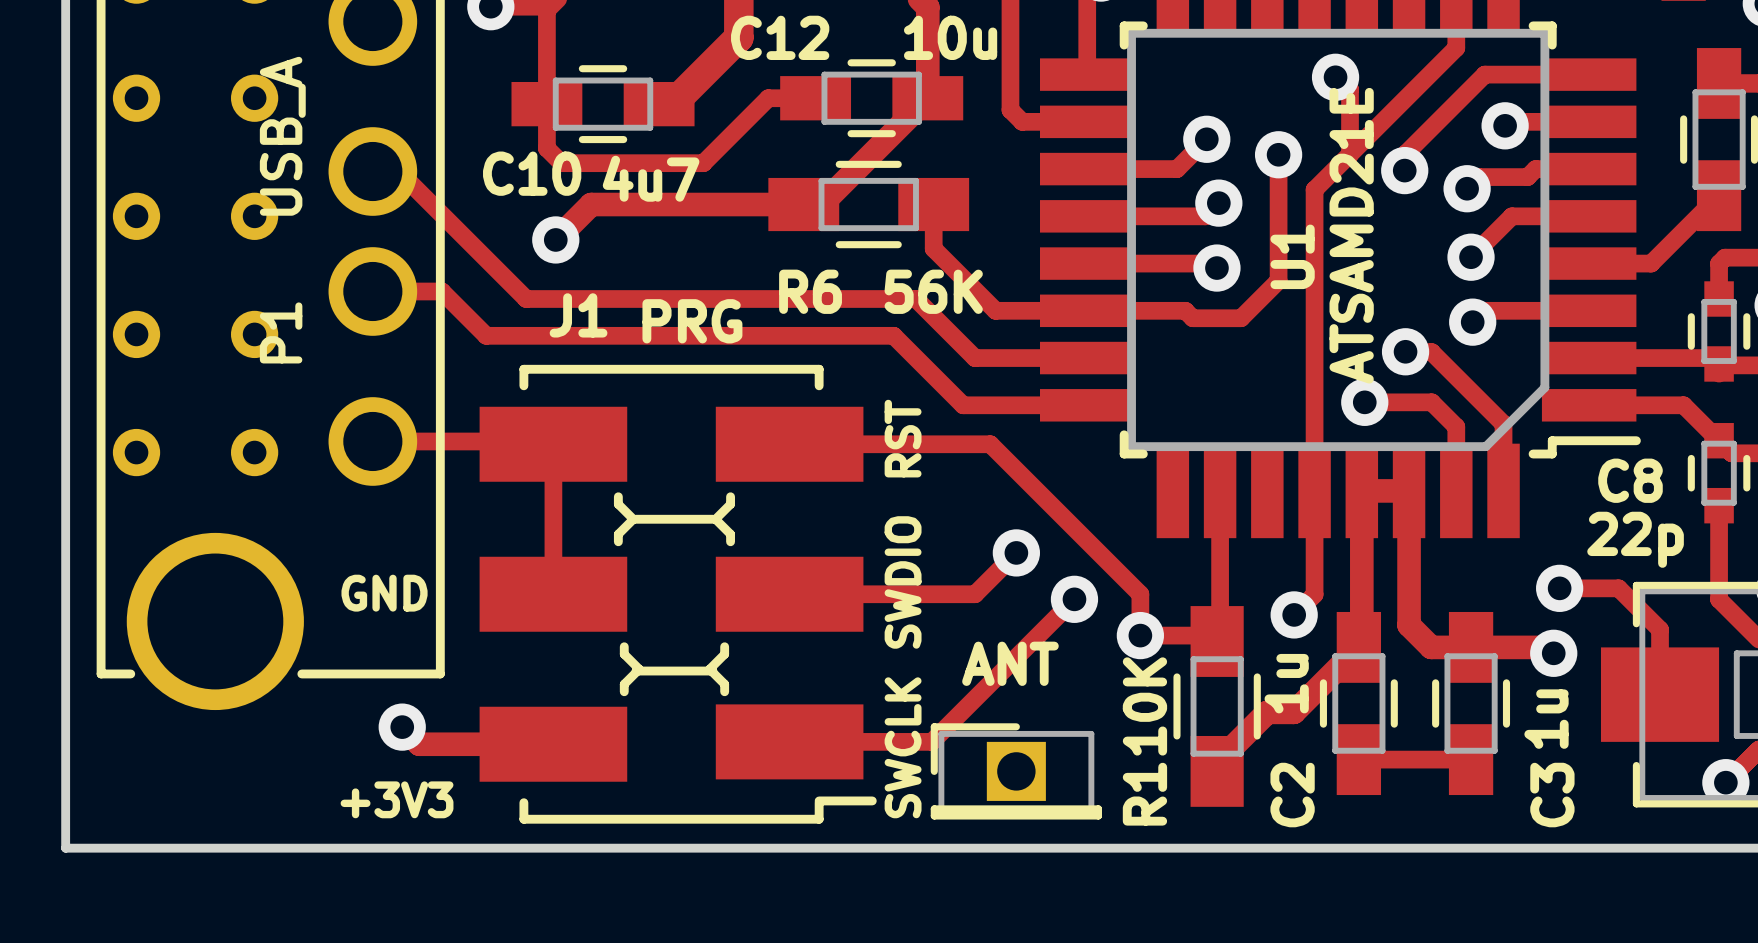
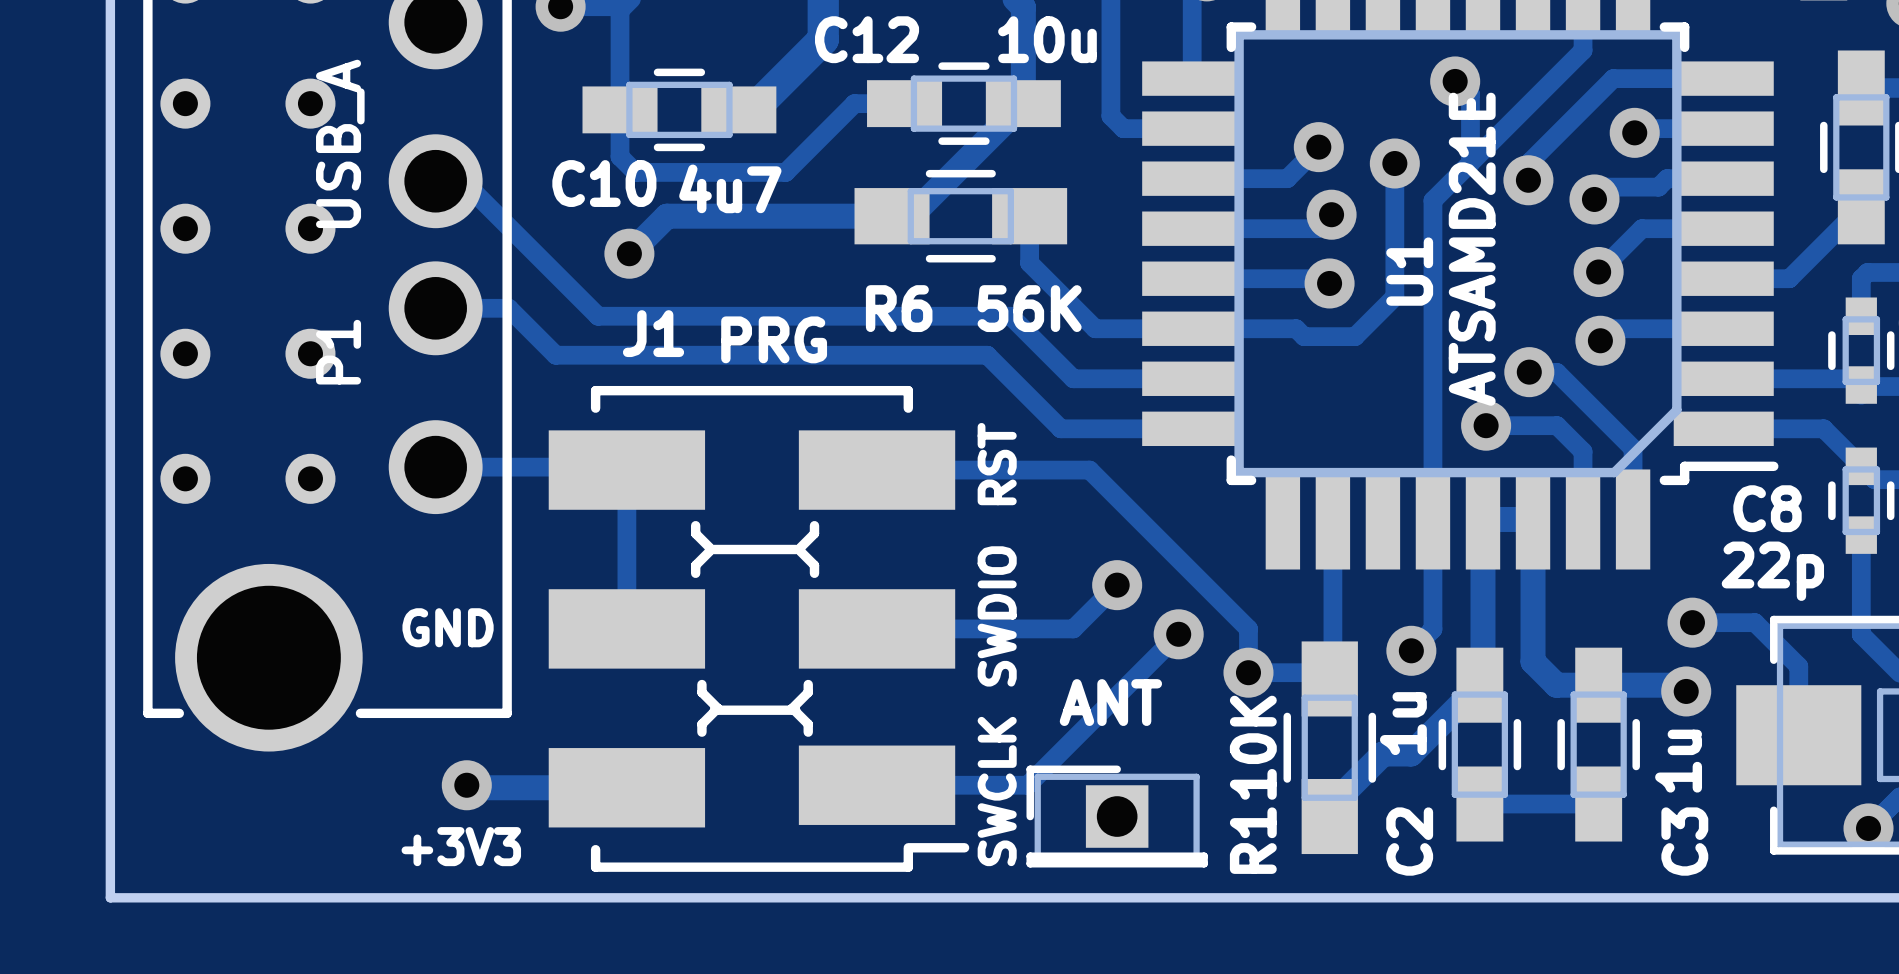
via position: (402, 727) -> (466, 785)

